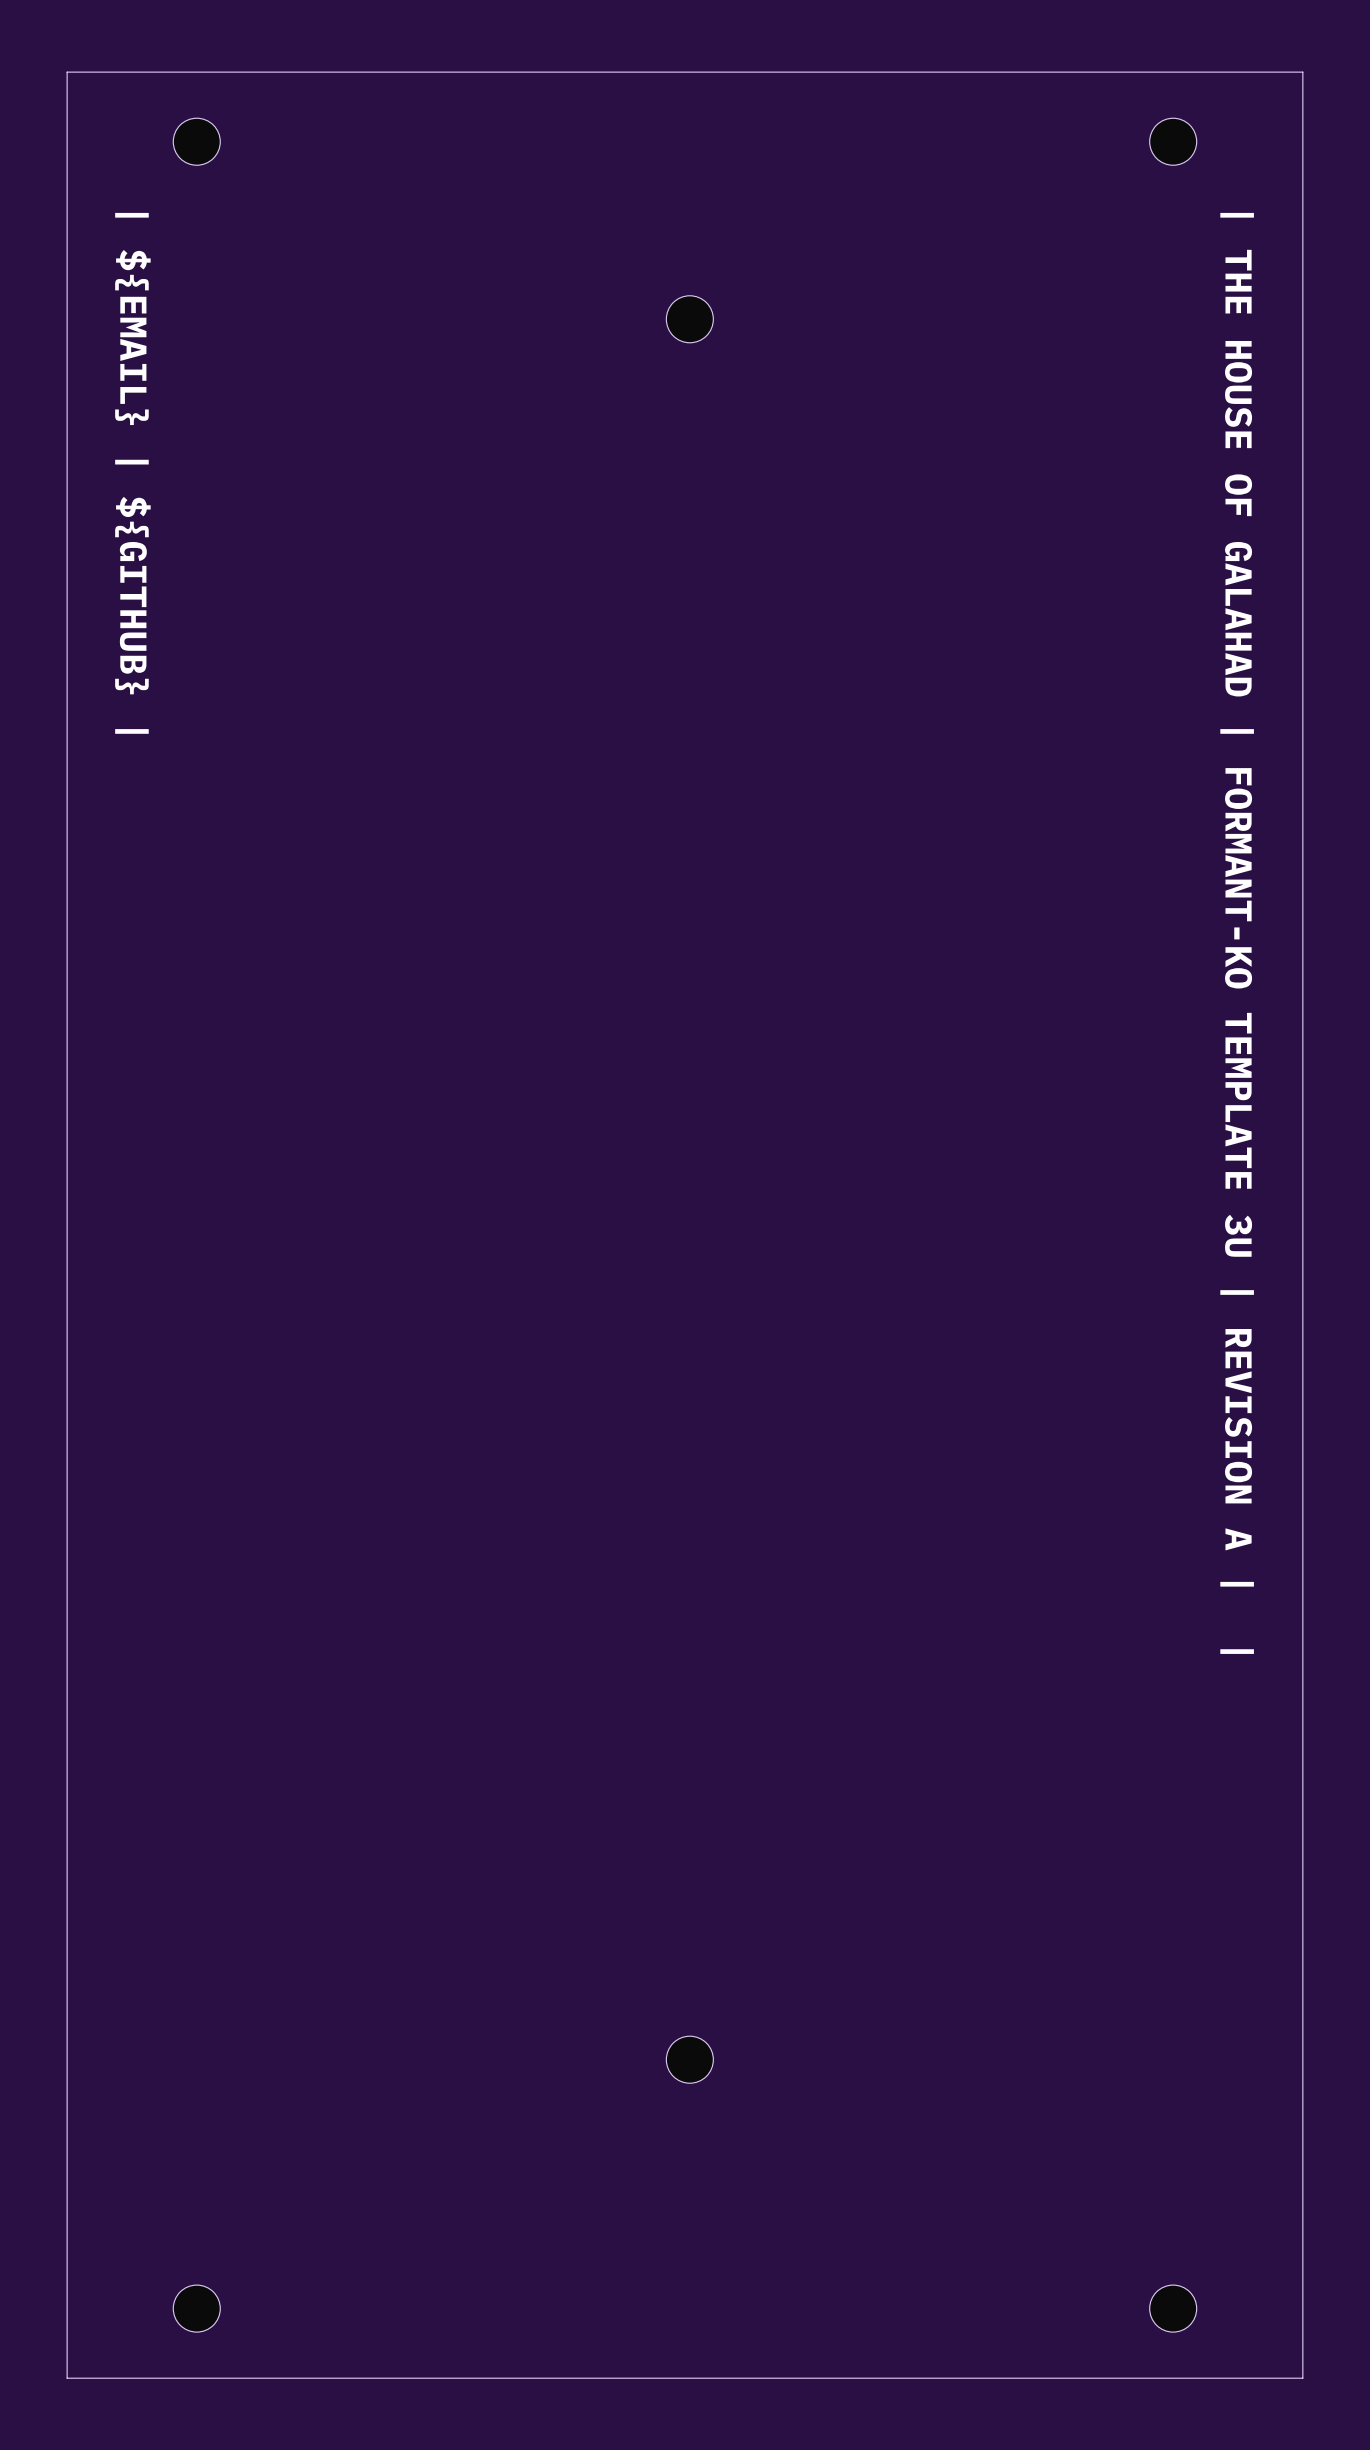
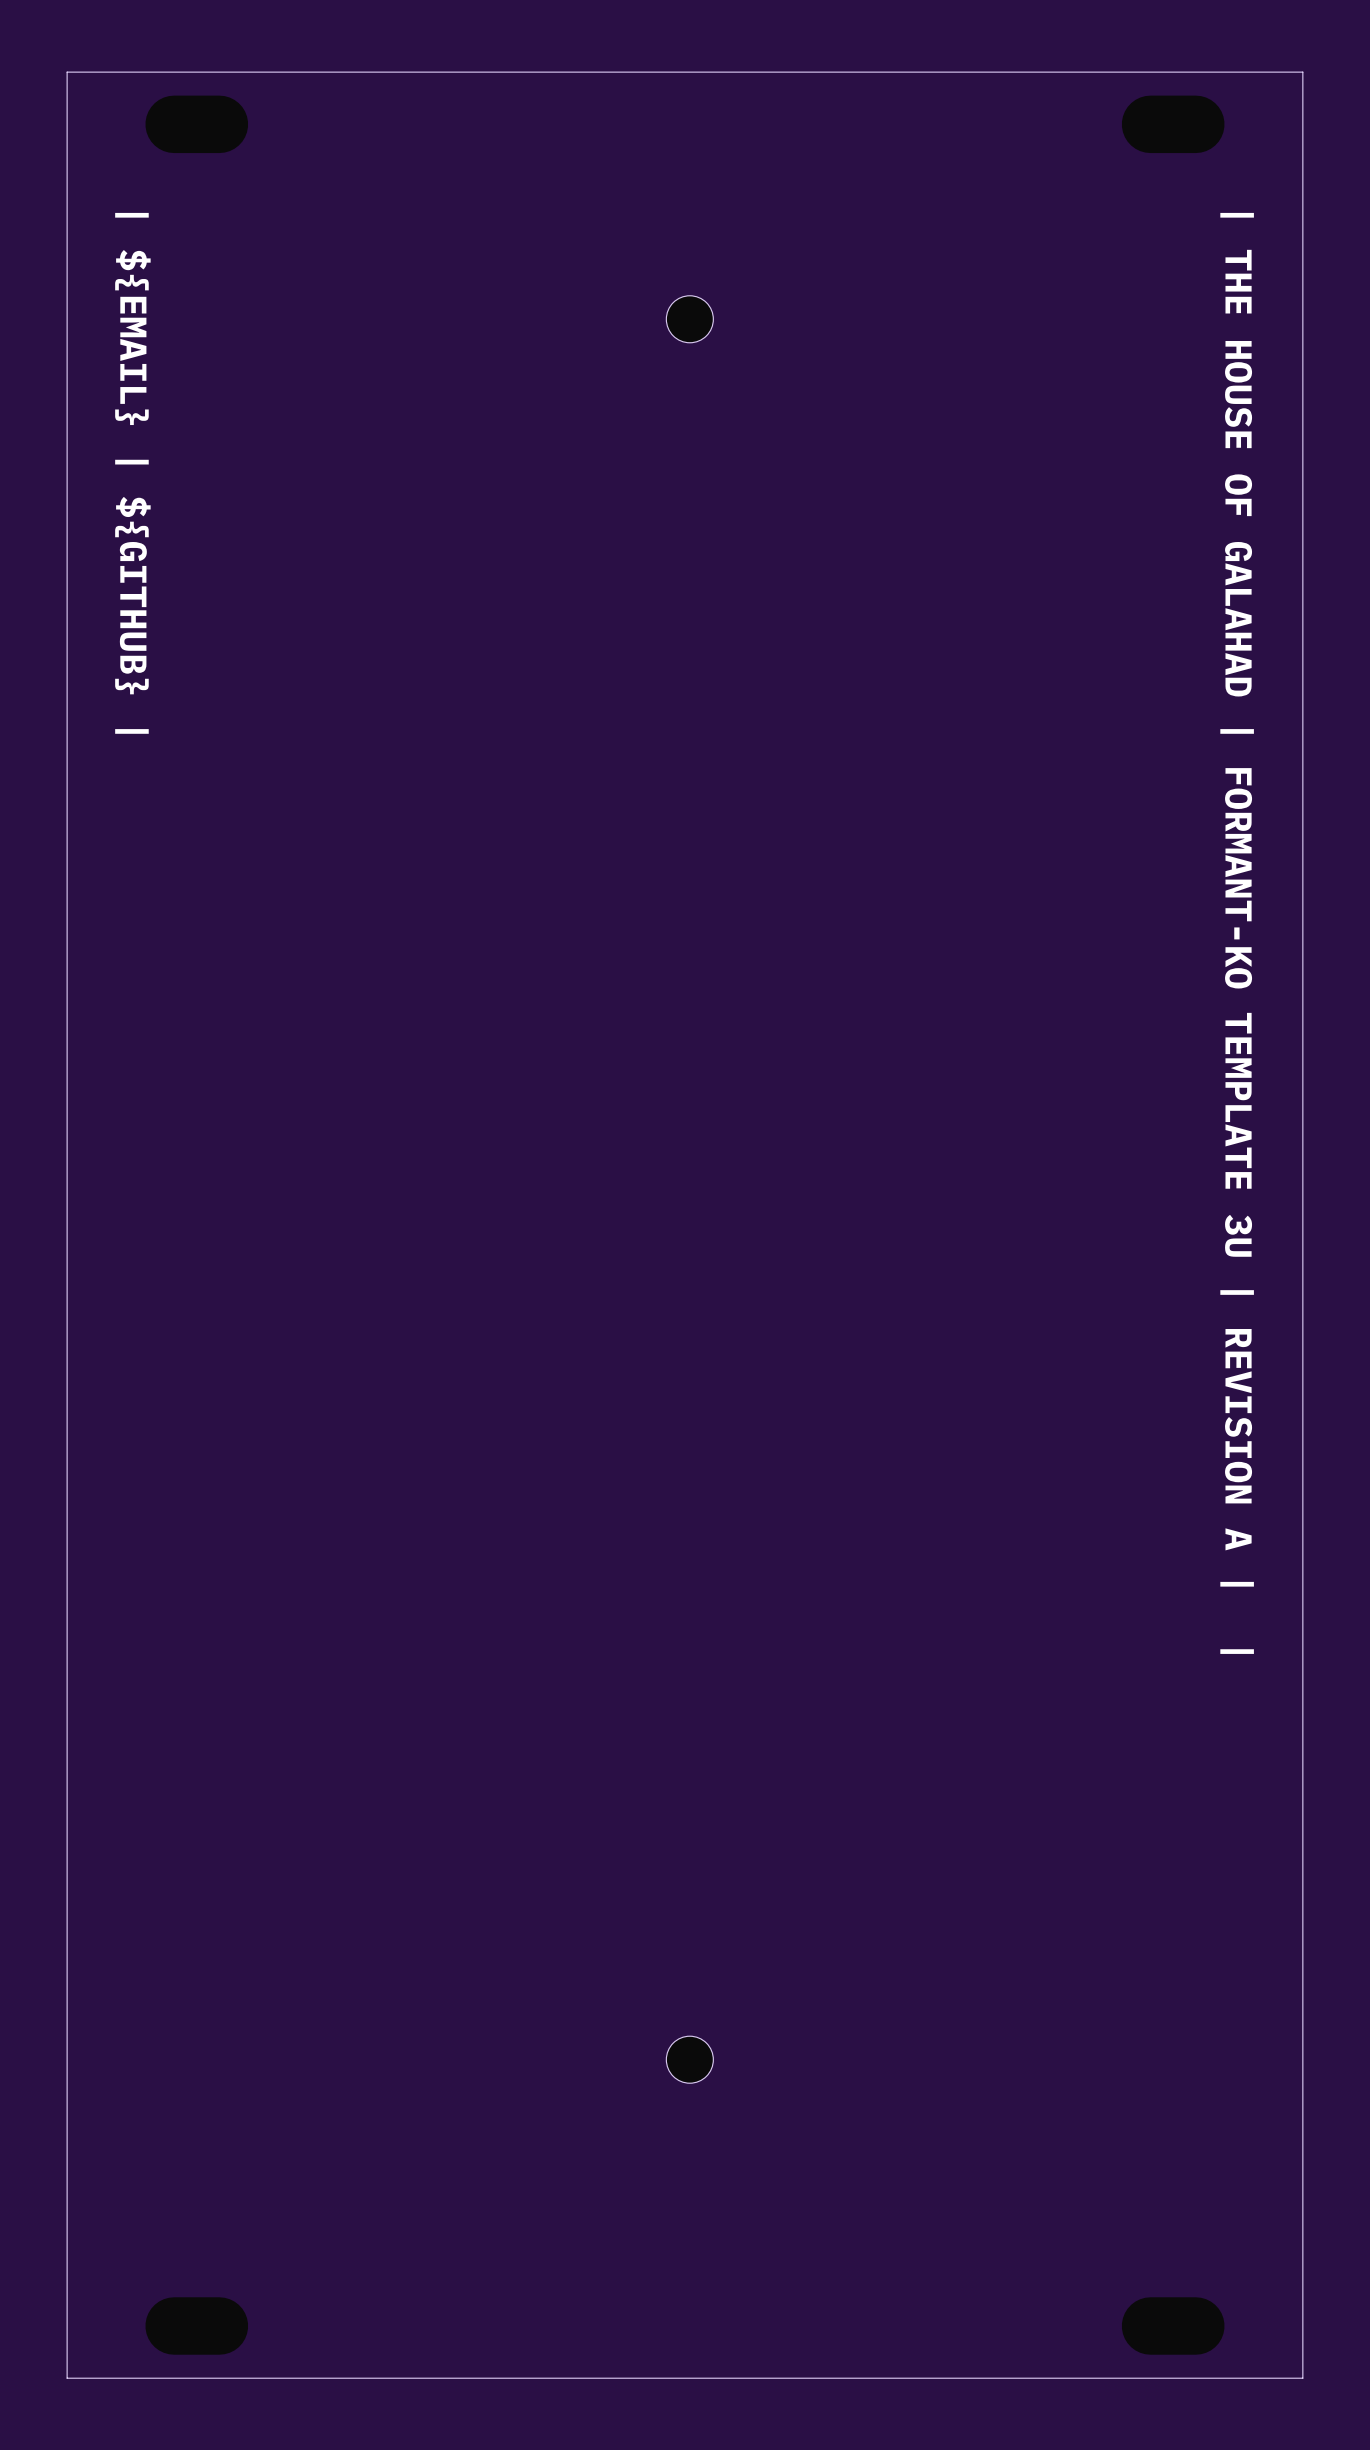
part footprint: [173, 118, 221, 166] -> [145, 95, 249, 154]
part footprint: [1149, 118, 1197, 166] -> [1121, 95, 1225, 154]
part footprint: [173, 2285, 221, 2333] -> [145, 2297, 249, 2355]
part footprint: [1149, 2285, 1197, 2333] -> [1121, 2297, 1225, 2355]

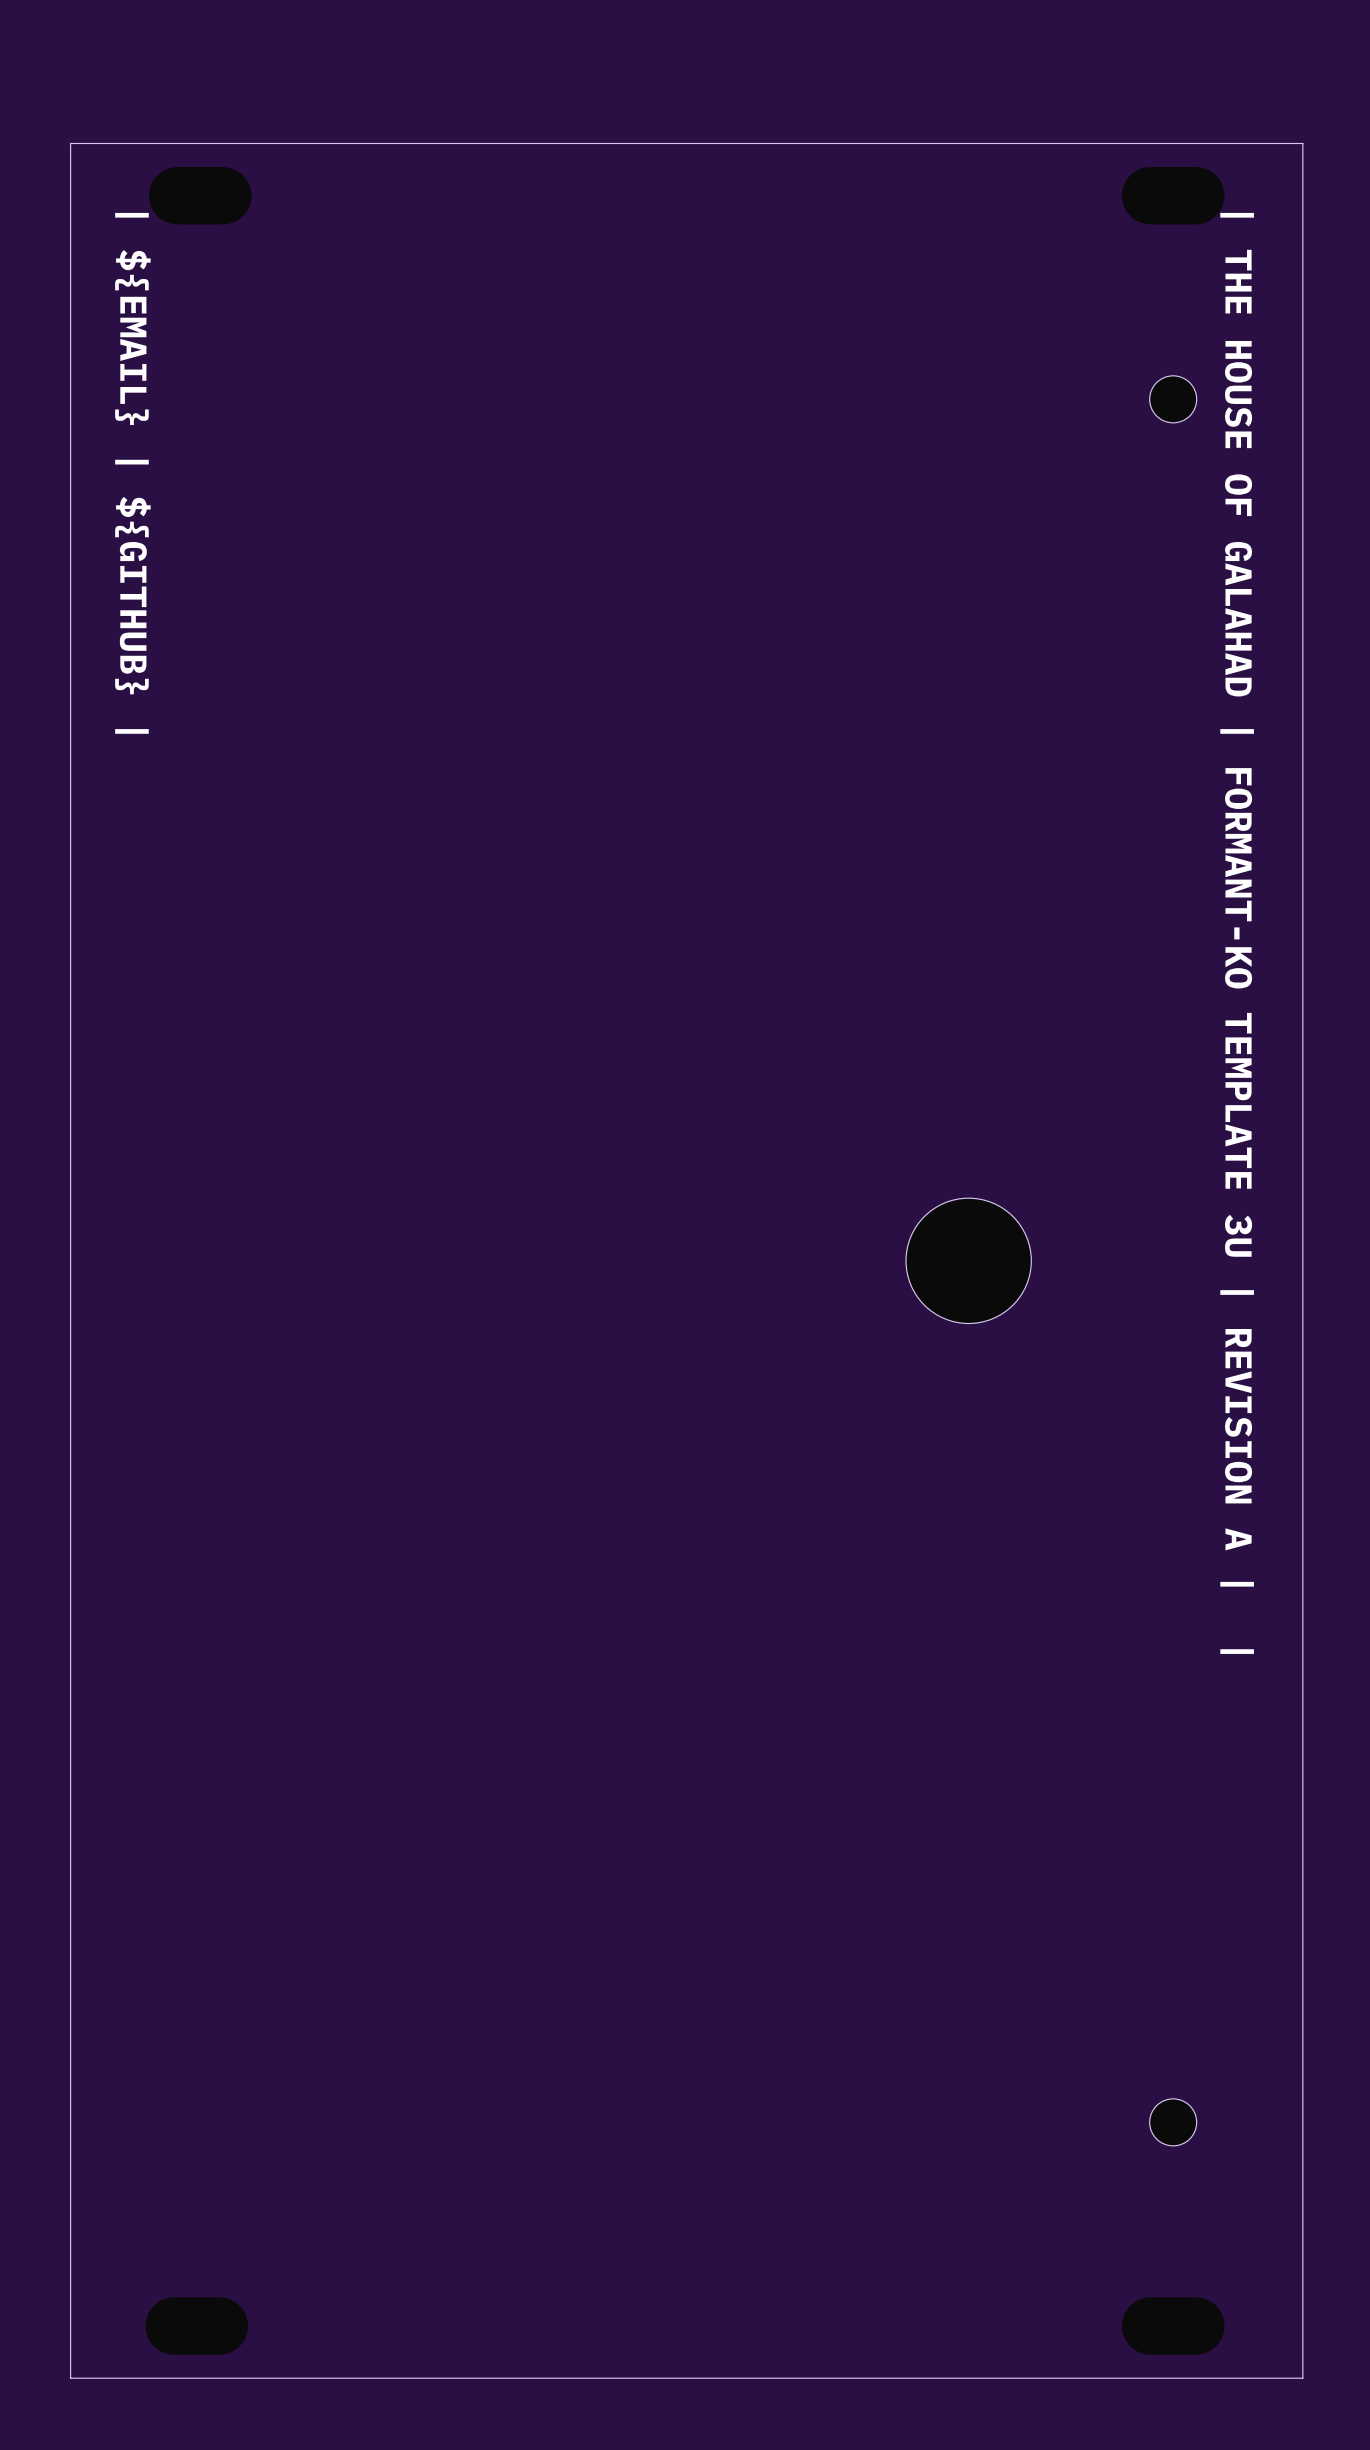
part position: (196, 124) -> (200, 195)
part position: (1173, 124) -> (1173, 195)
board edge: (1302, 143) (1302, 72) (67, 72) (67, 2378) (70, 2378) -> (1302, 143) (70, 143) (70, 2378)
part: (689, 319) -> none
part: none -> (1173, 399)
part: none -> (968, 1260)
part: (689, 2059) -> none
part: none -> (1173, 2122)

